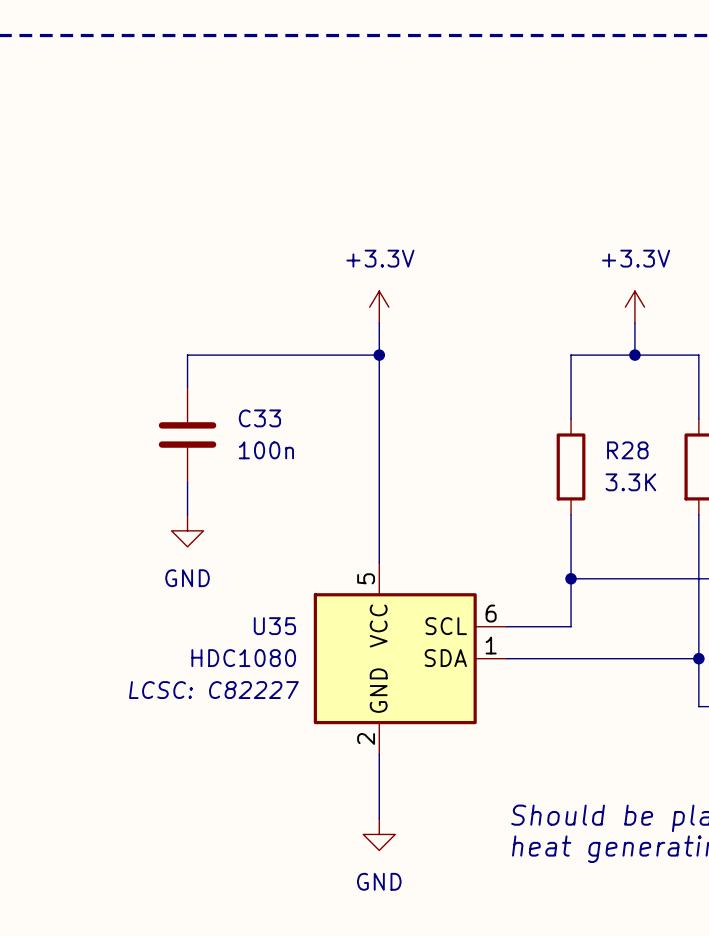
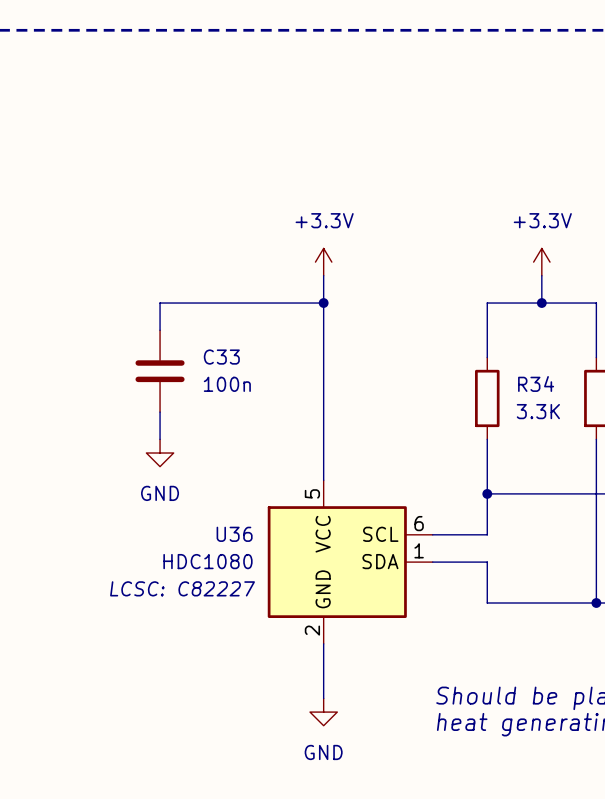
R28 name: R28 (627, 450) -> R34 (536, 383)
U35 name: U35 (274, 626) -> U36 (234, 534)
wire: (571, 658) (698, 658) -> (487, 562) (487, 602) (596, 602)
junction position: (698, 658) -> (596, 602)

